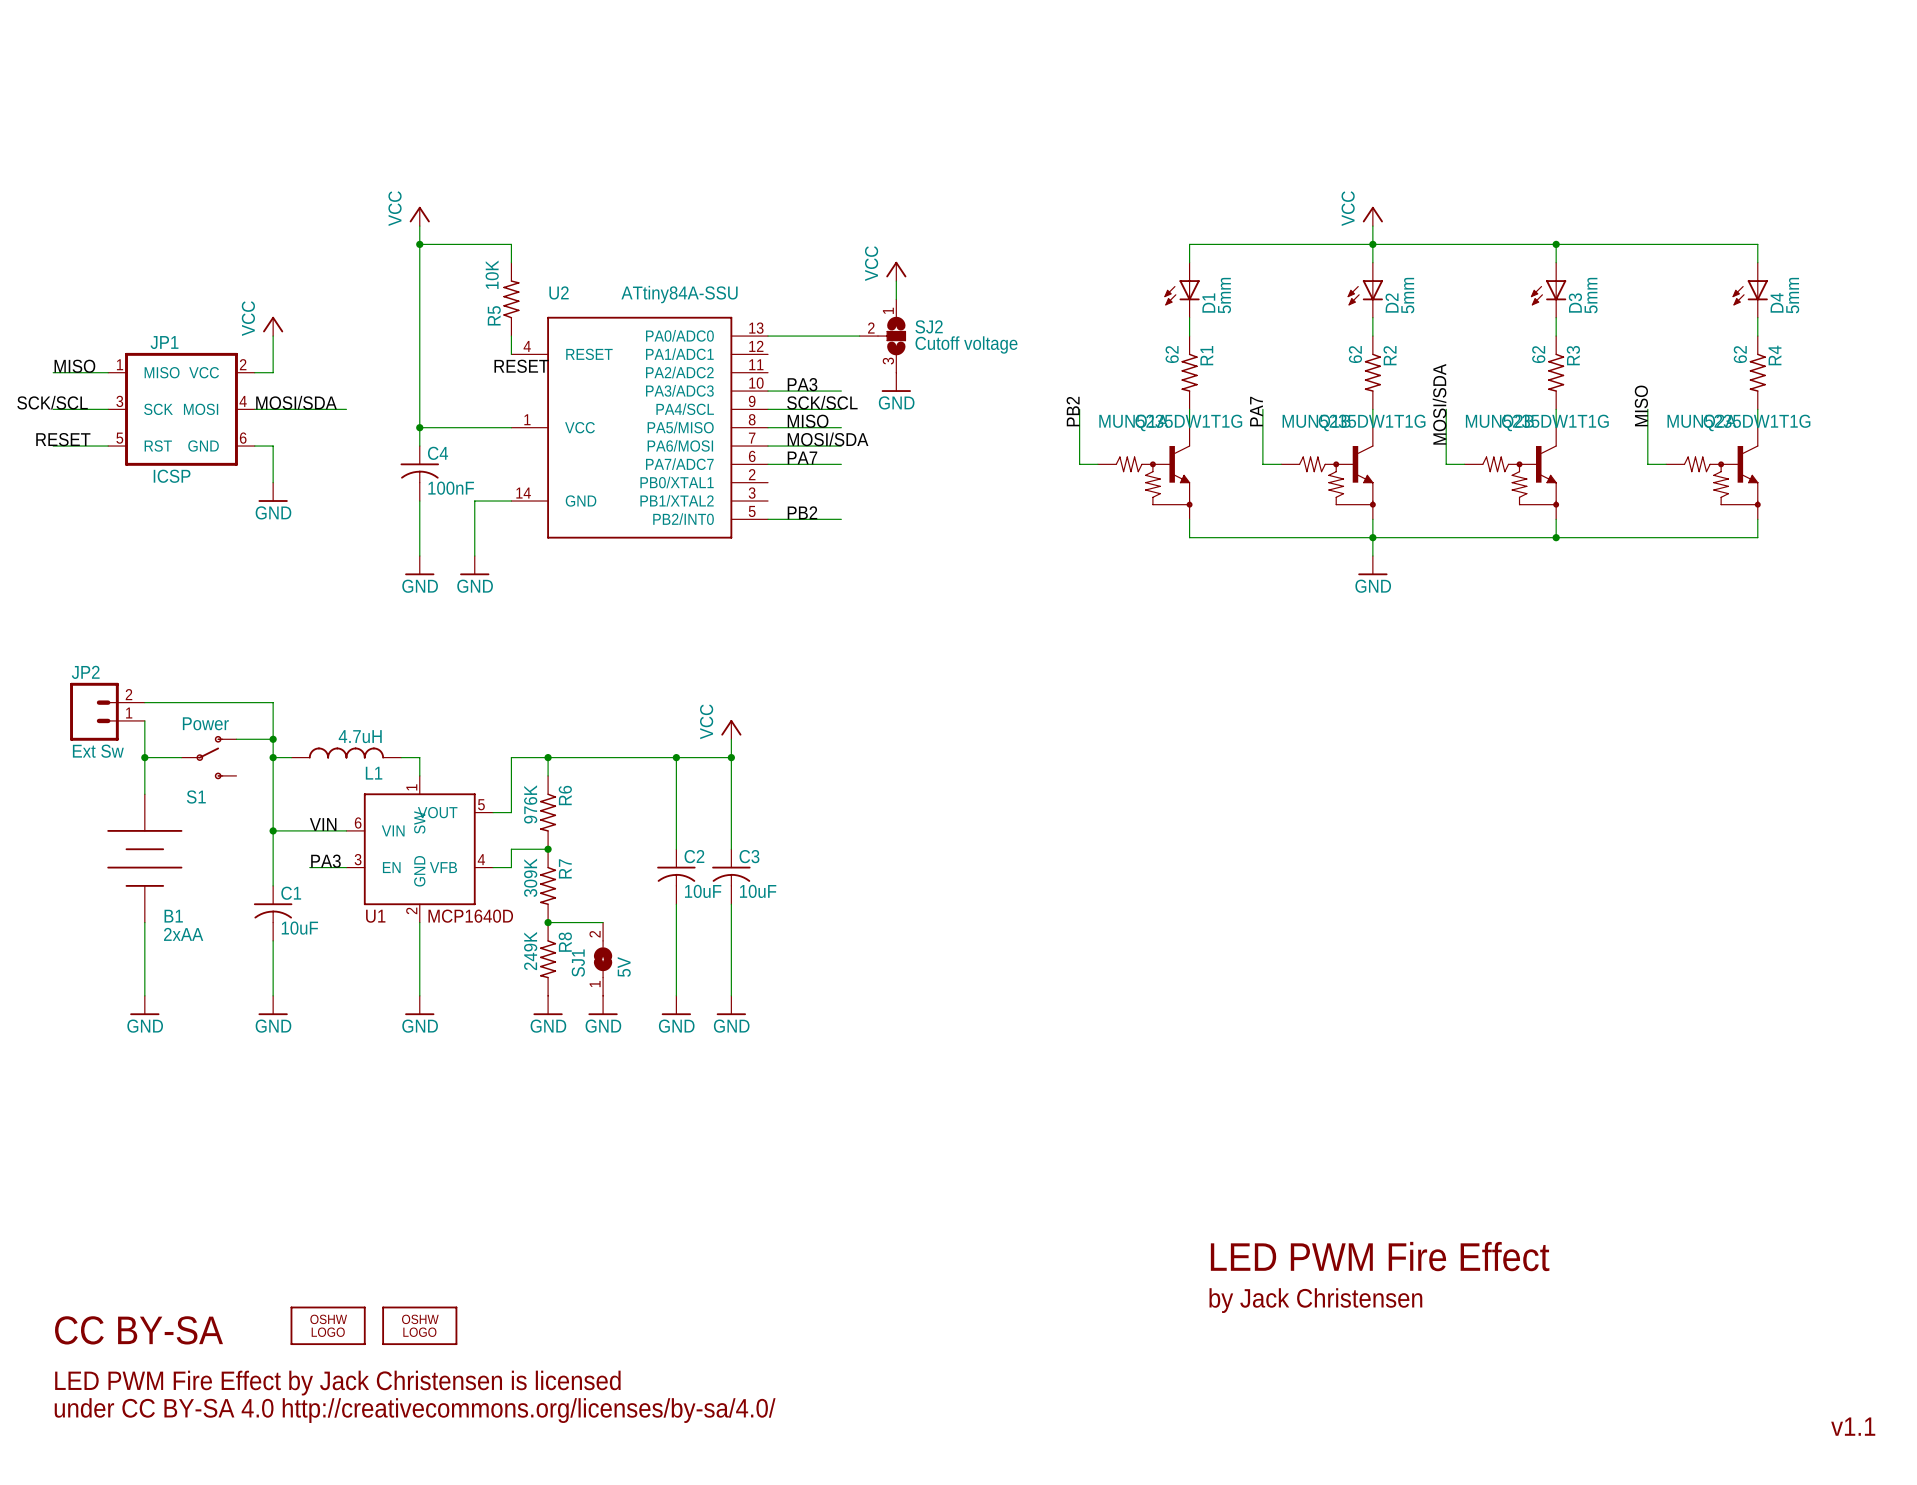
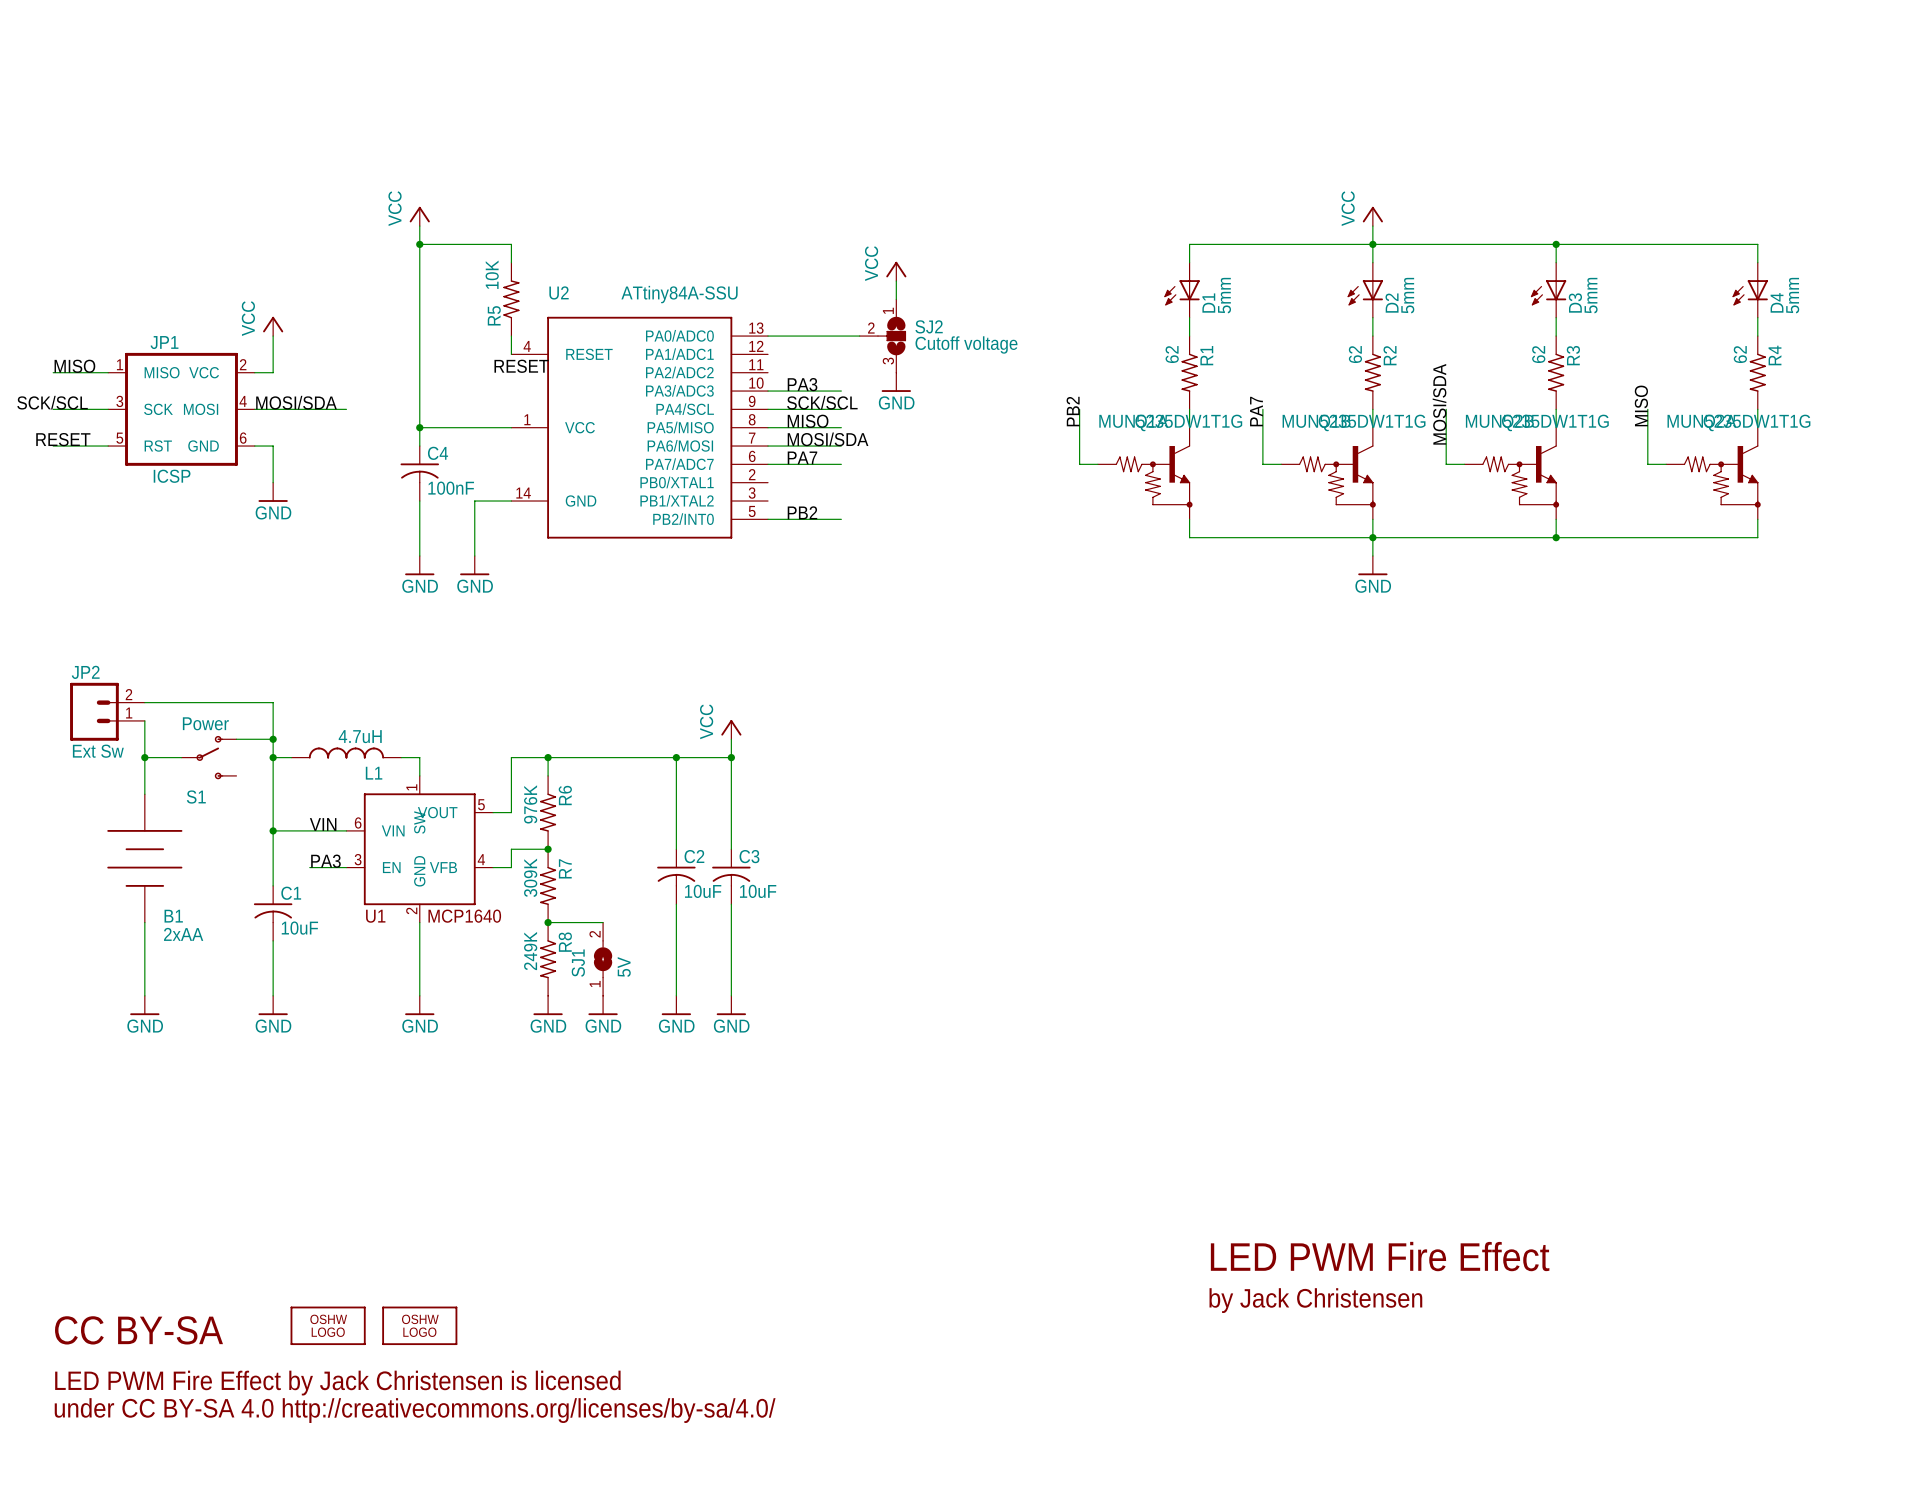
U1 value: MCP1640D (470, 916) -> MCP1640 (464, 916)
text: v1.1 (1853, 1426) -> none

